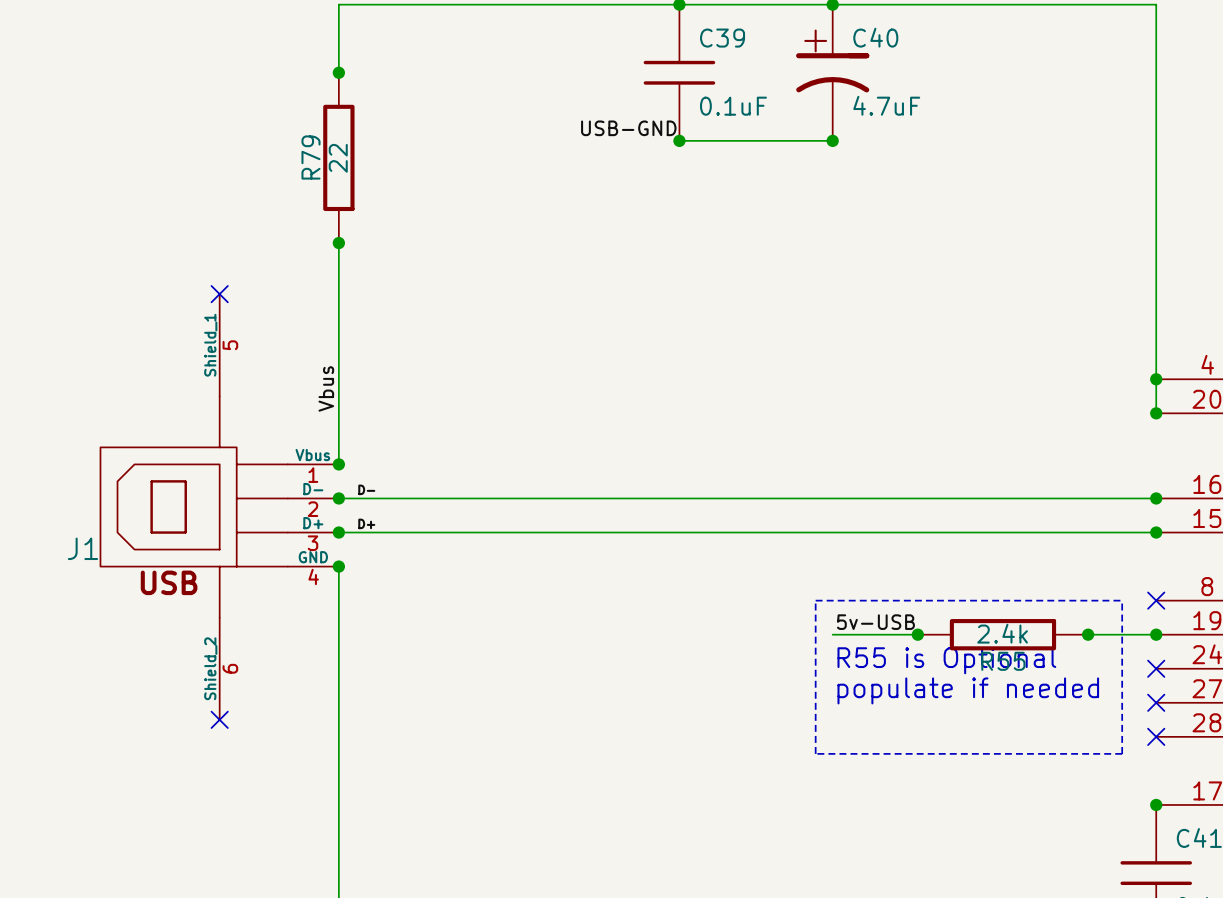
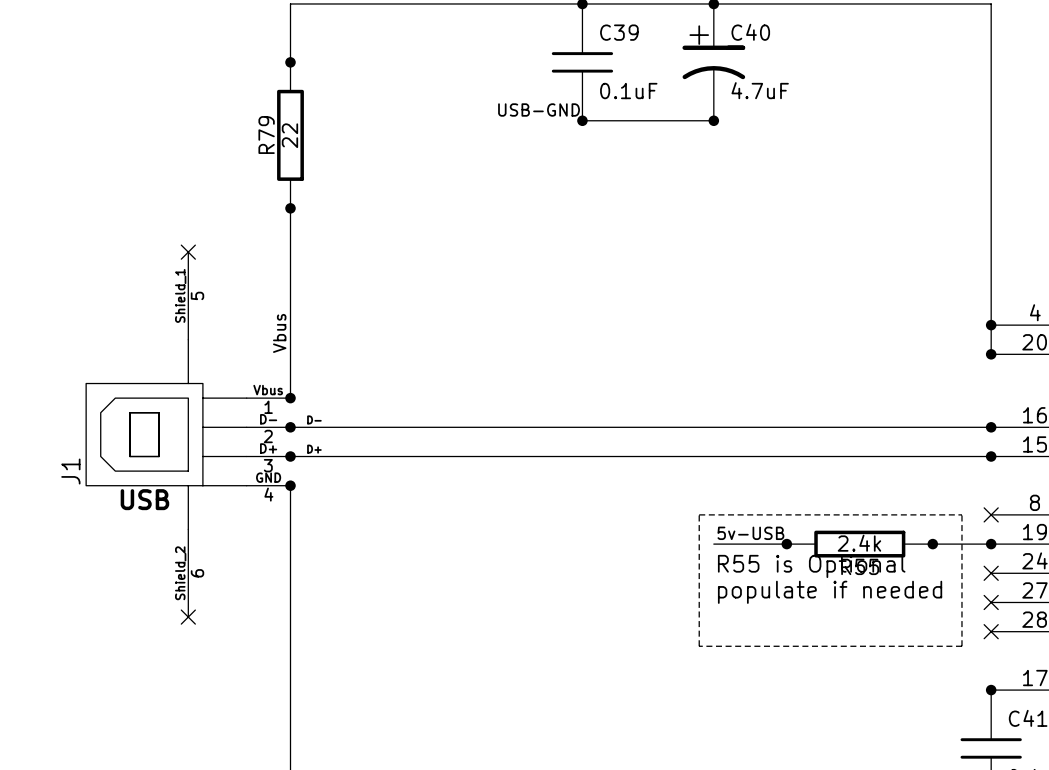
J1 name rotation: 0° (82, 548) -> 90° counterclockwise (70, 471)

